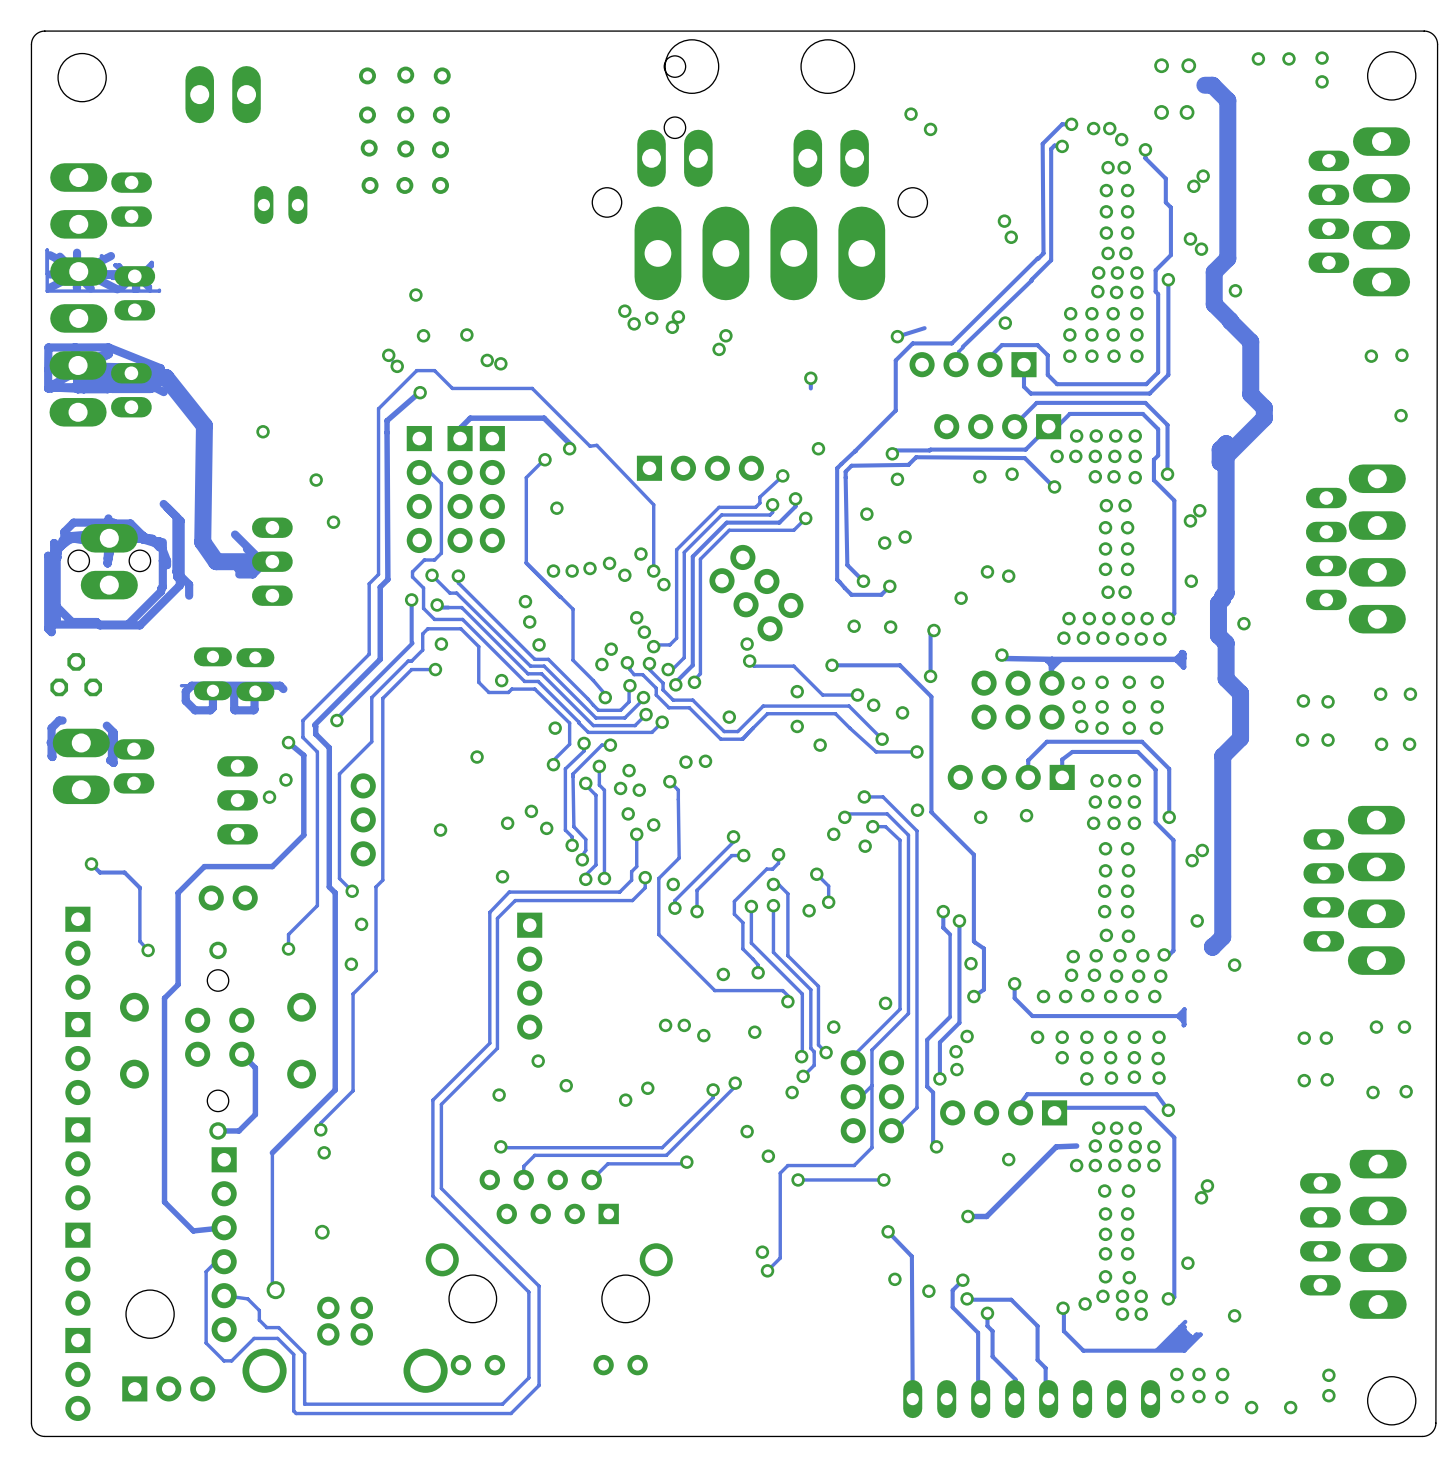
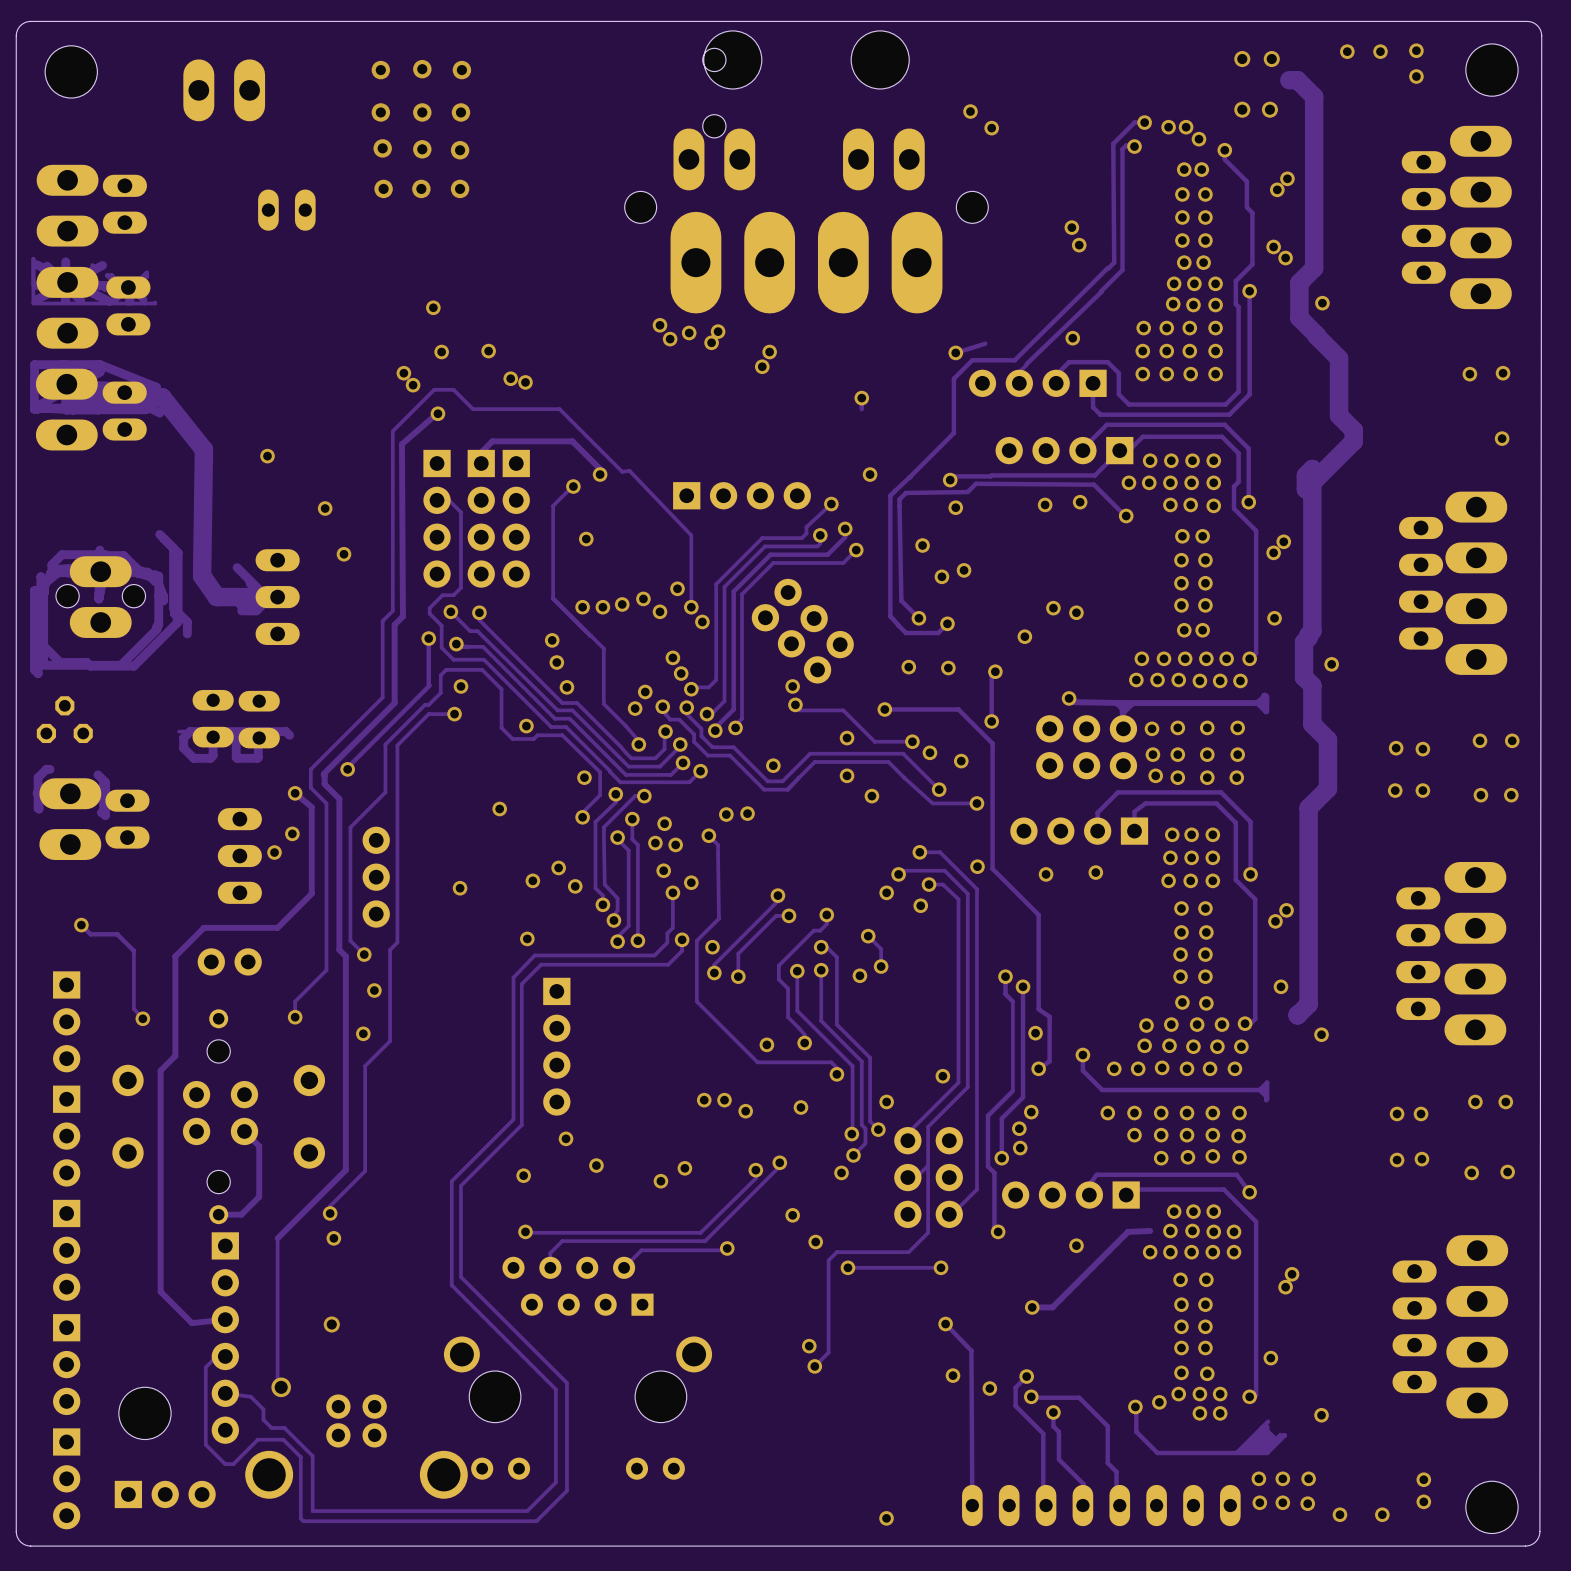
via: none -> (886, 1518)

